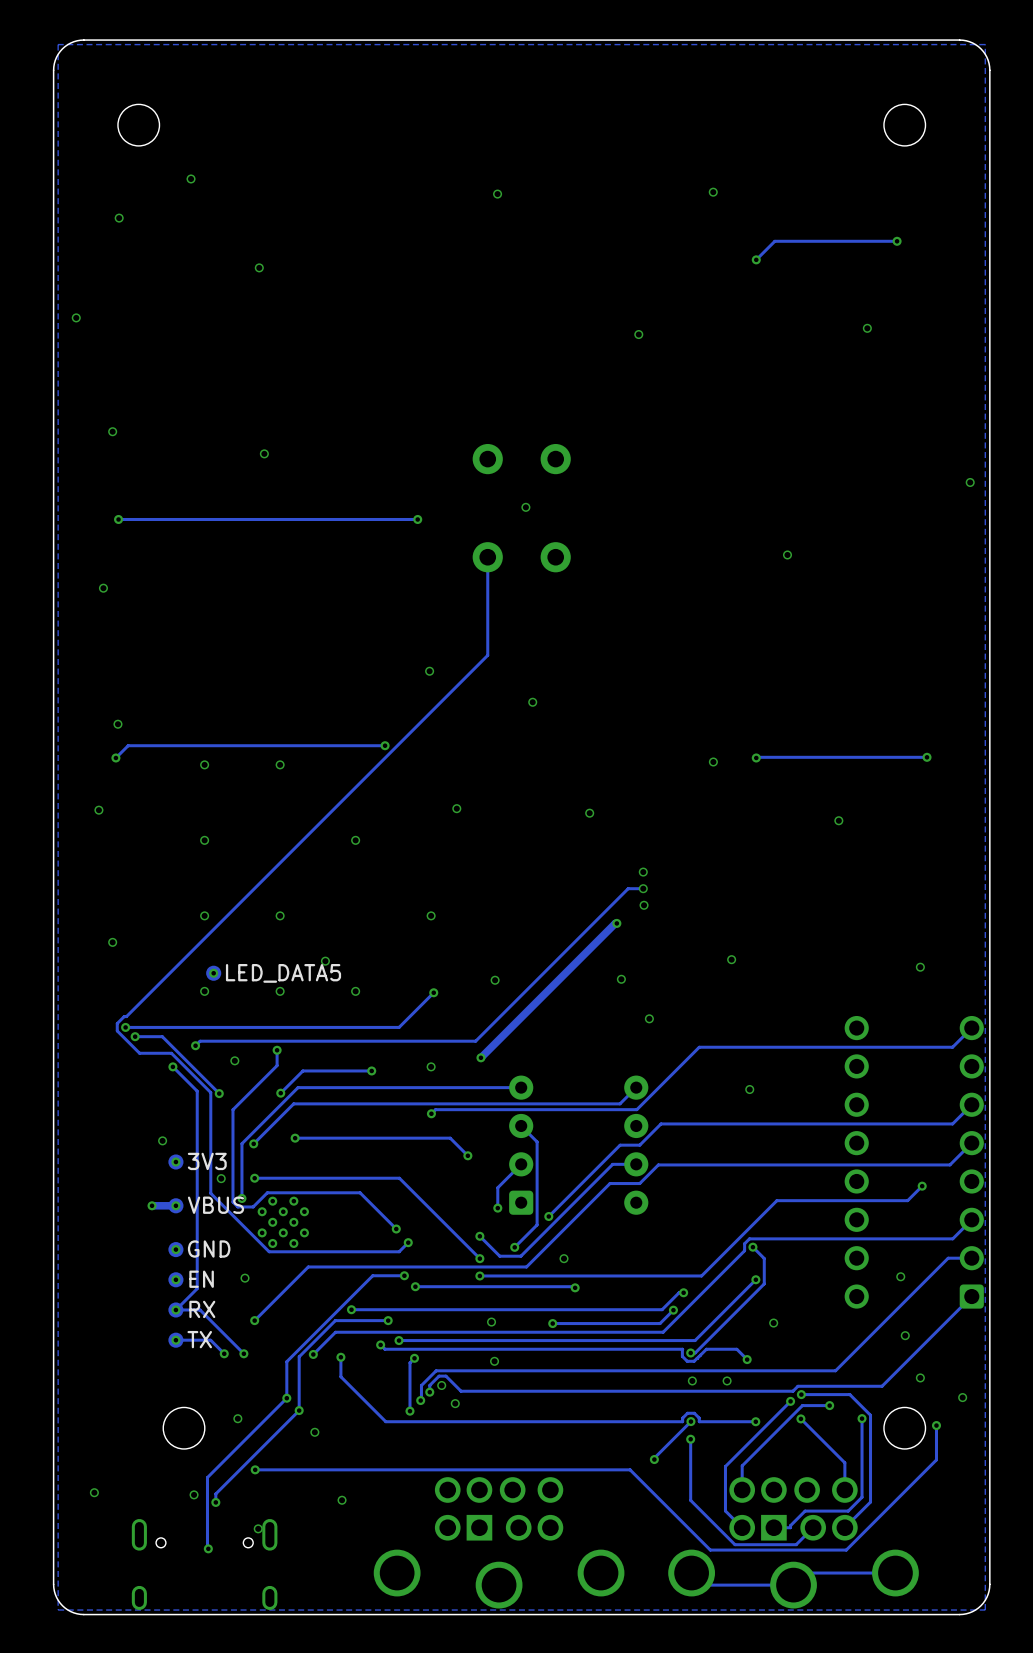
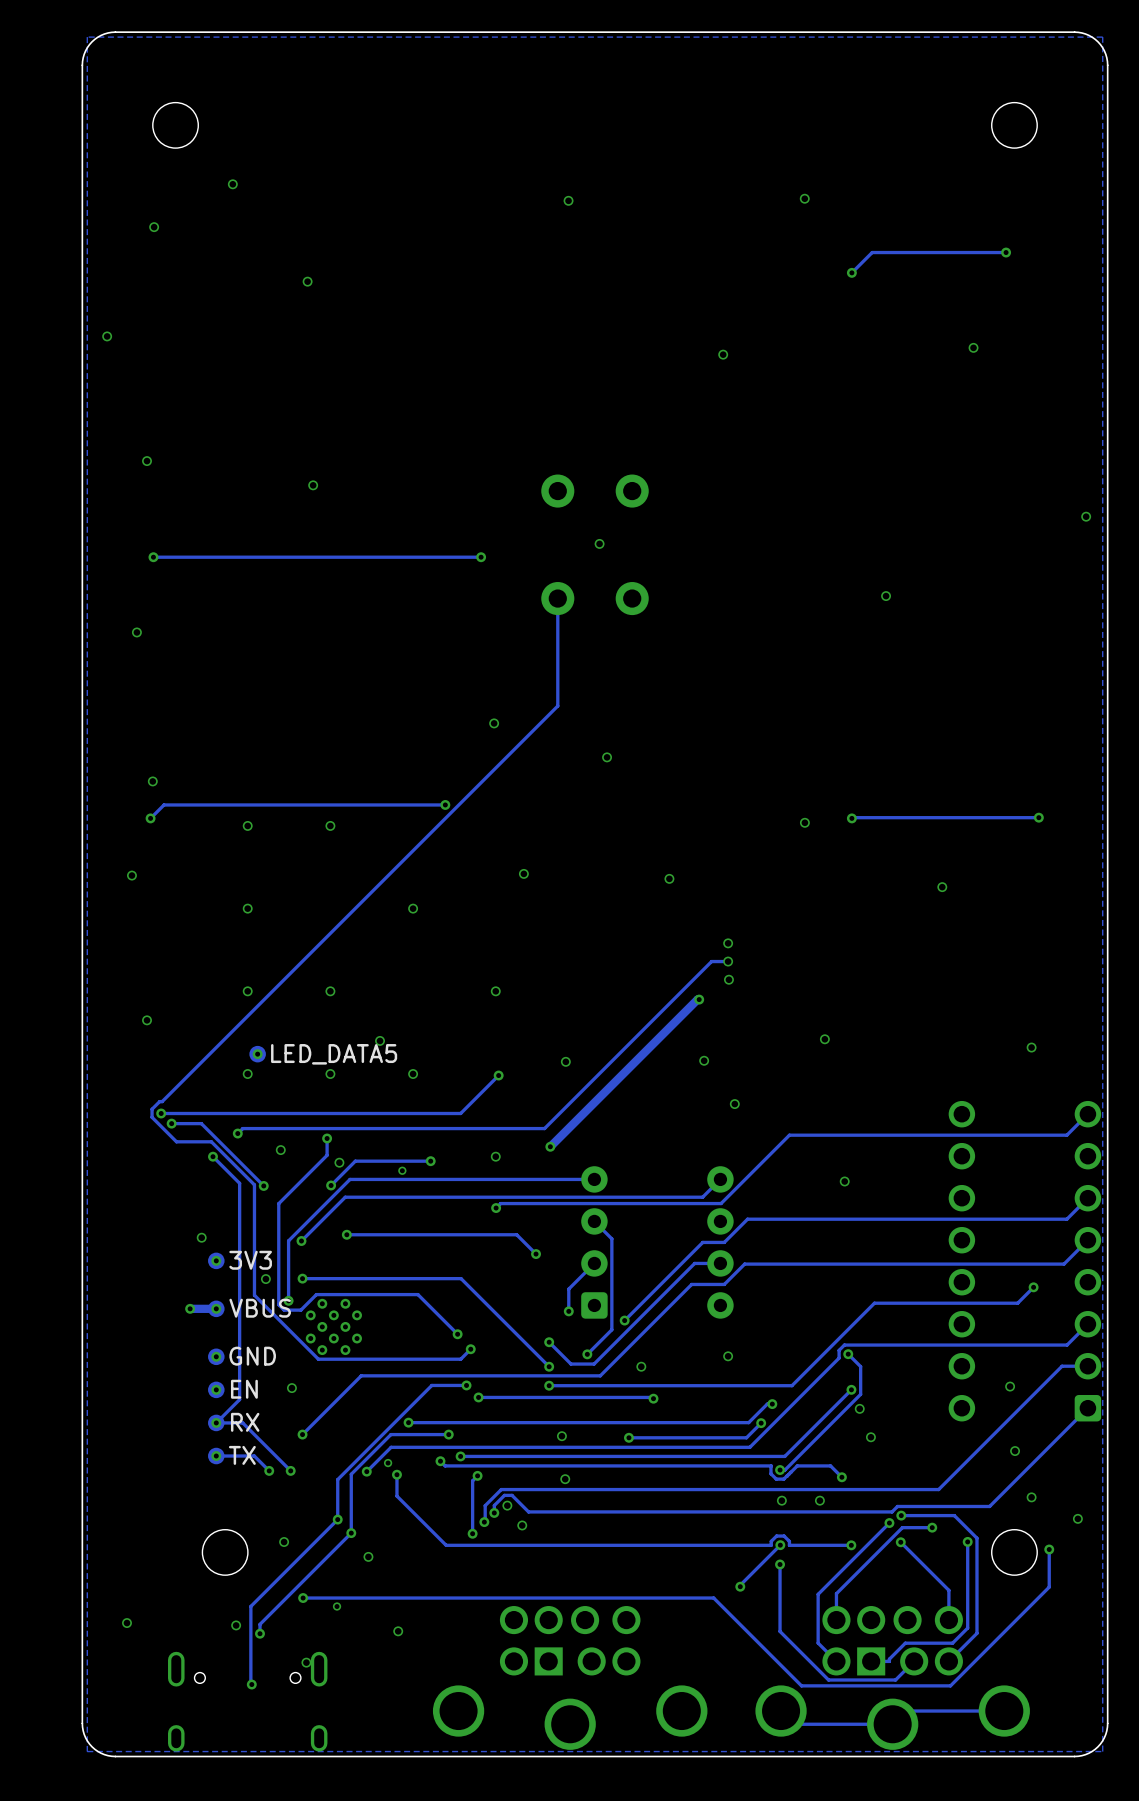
via: none -> (339, 1162)
via: none -> (402, 1170)
via: none -> (728, 1356)
via: none -> (859, 1408)
via: none -> (388, 1463)
via: none -> (337, 1606)

